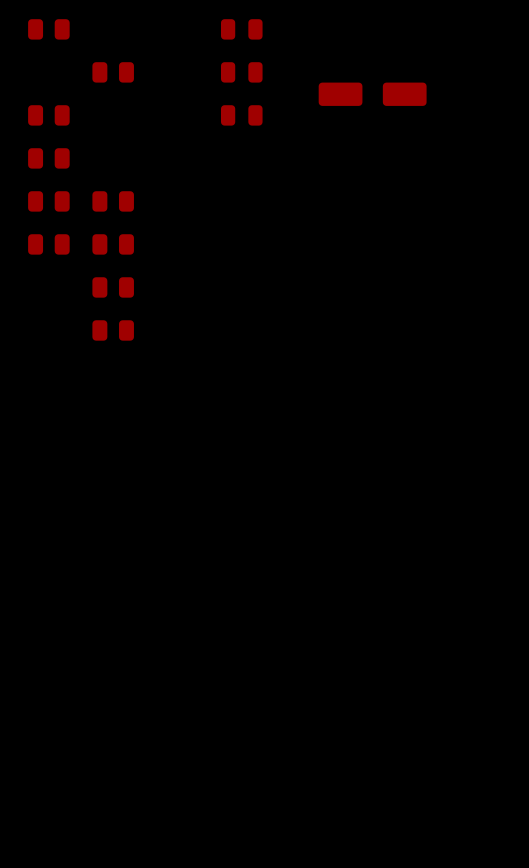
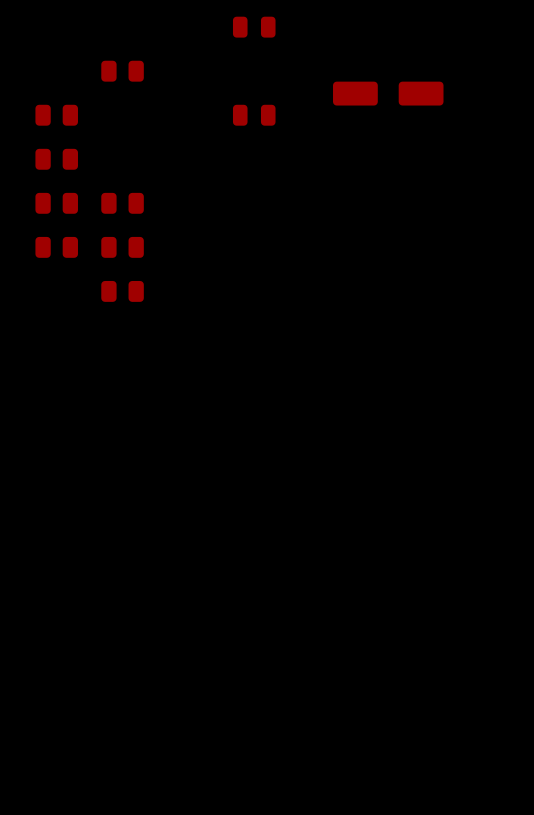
part: (48, 29) -> none
part: (241, 72) -> none
part: (113, 330) -> none

